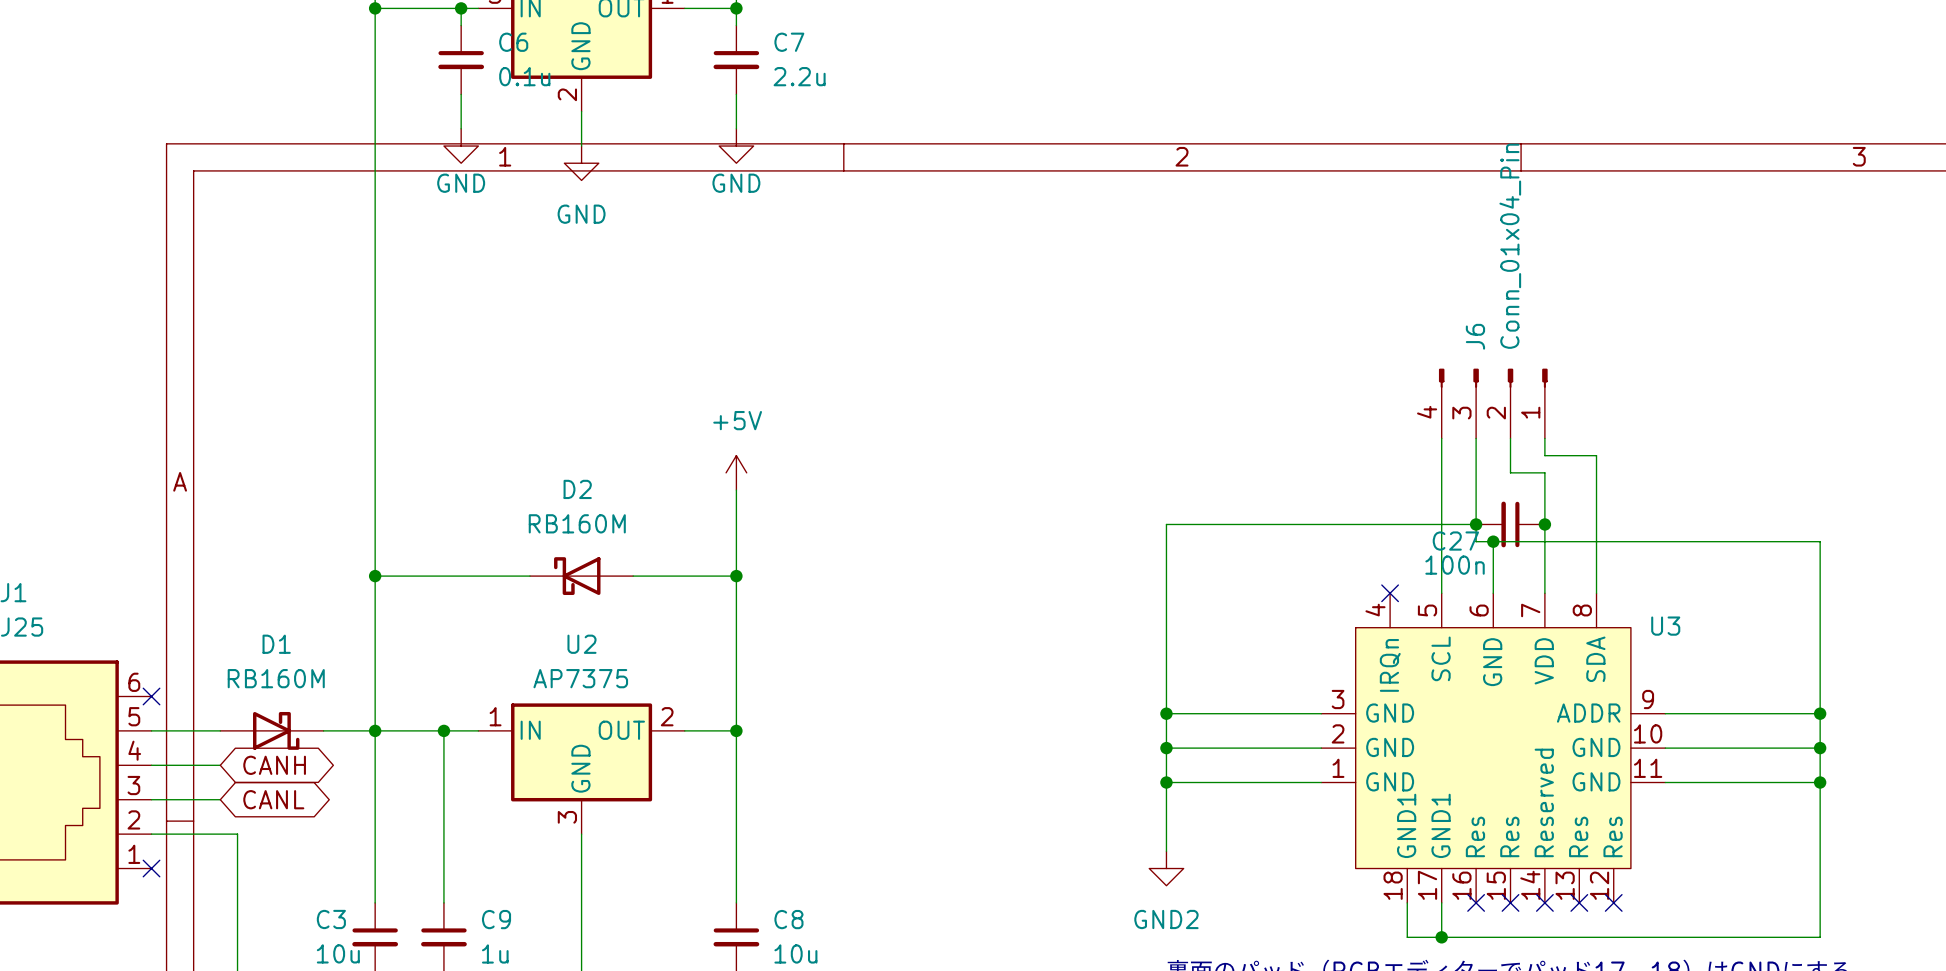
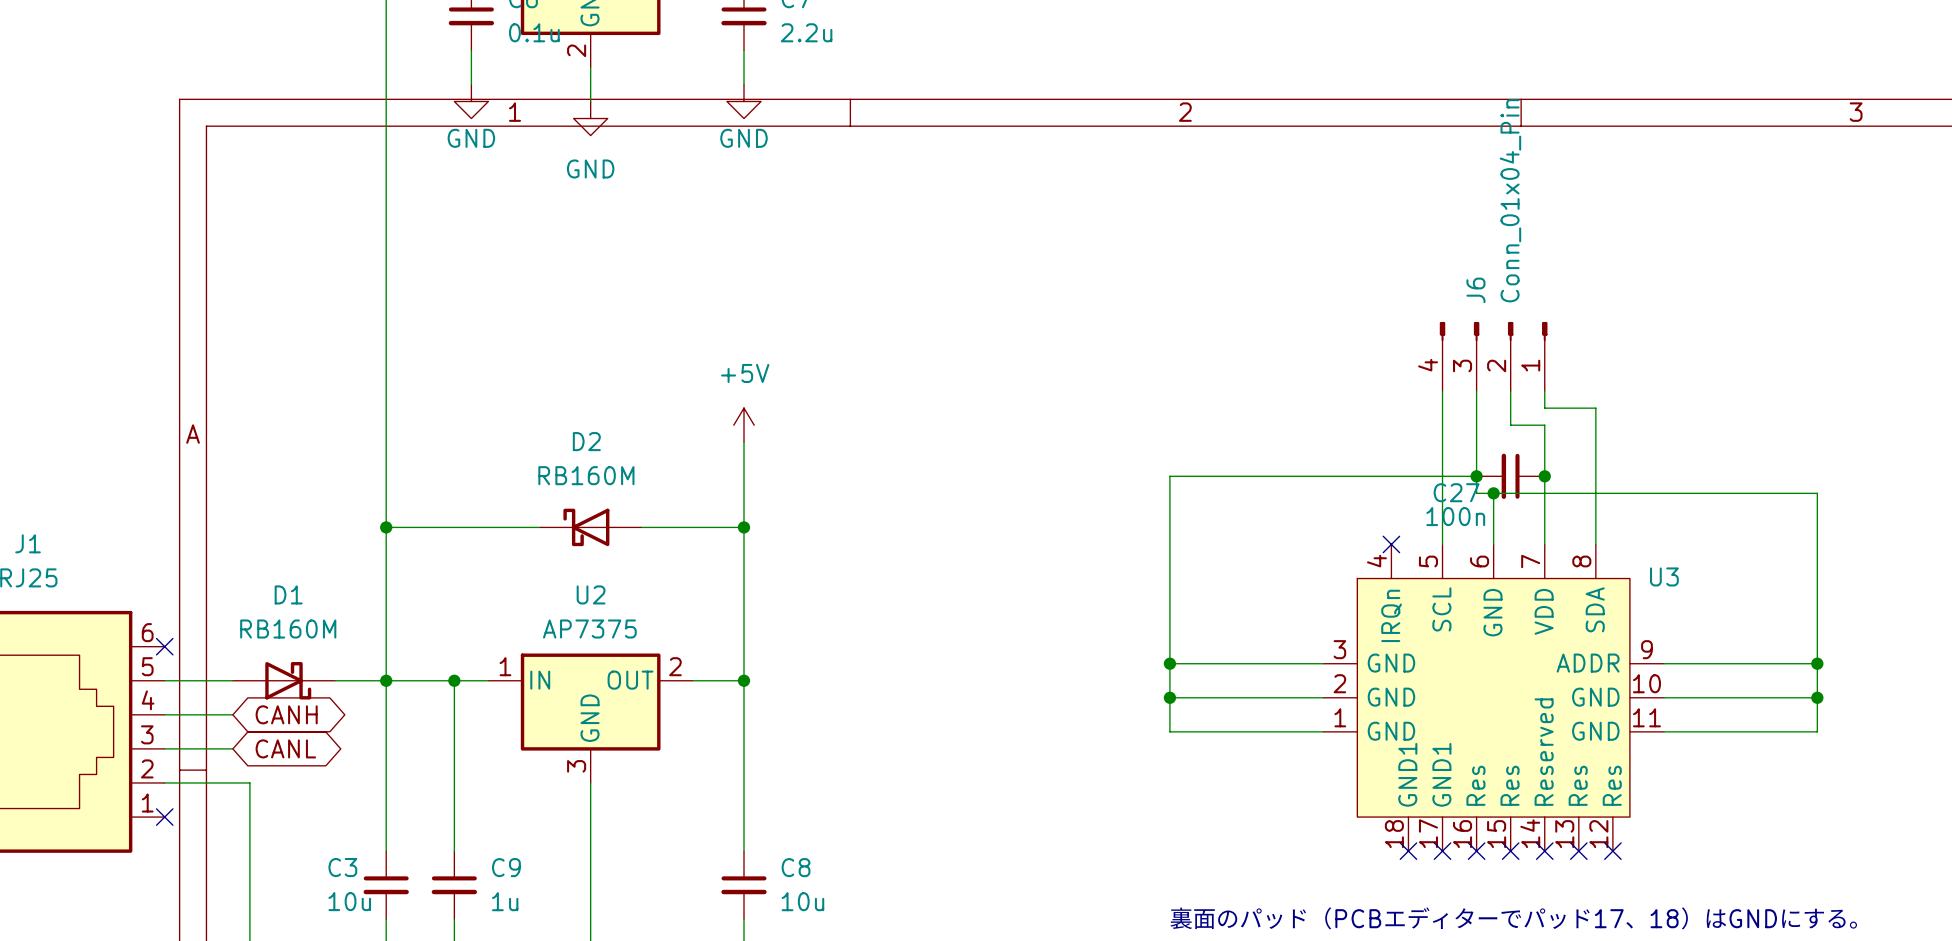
wire: (1166, 782) (1166, 851) -> none
junction: (1166, 782) -> none
wire: (1820, 782) (1820, 937) (1407, 937) (1407, 902) -> none
junction: (1820, 782) -> none
power symbol: GND2 (1166, 868) -> none
no-connect mark: none -> (1408, 851)
wire: (1441, 902) (1441, 937) -> none
no-connect mark: none -> (1442, 851)
junction: (1441, 937) -> none

